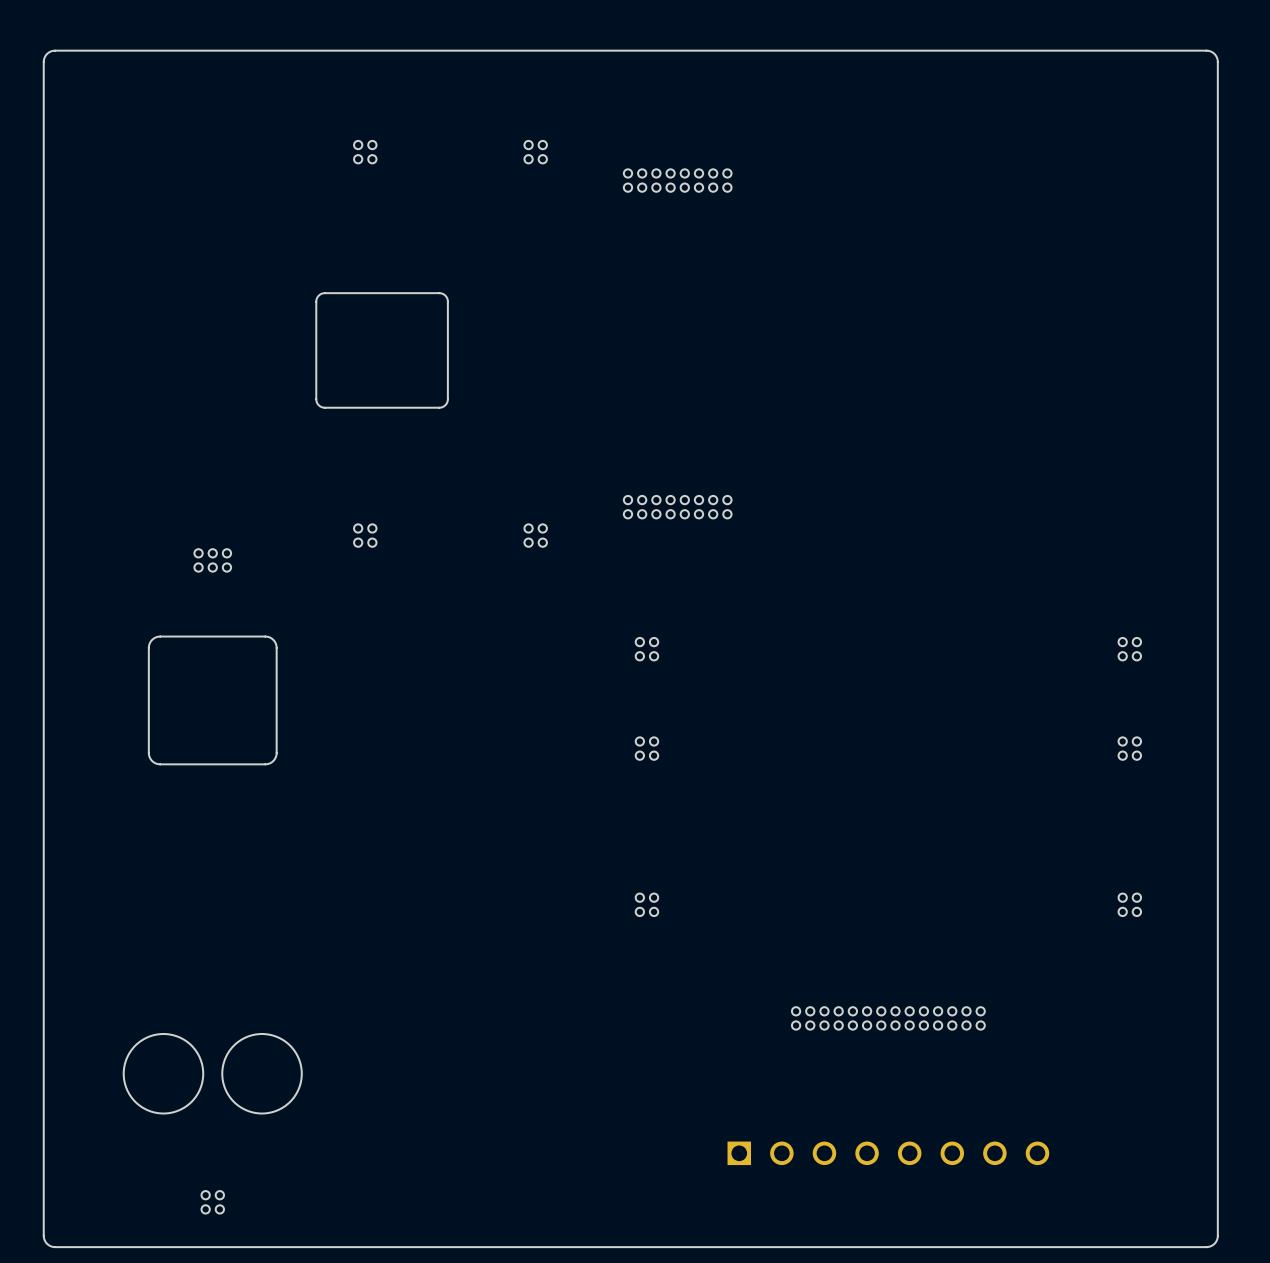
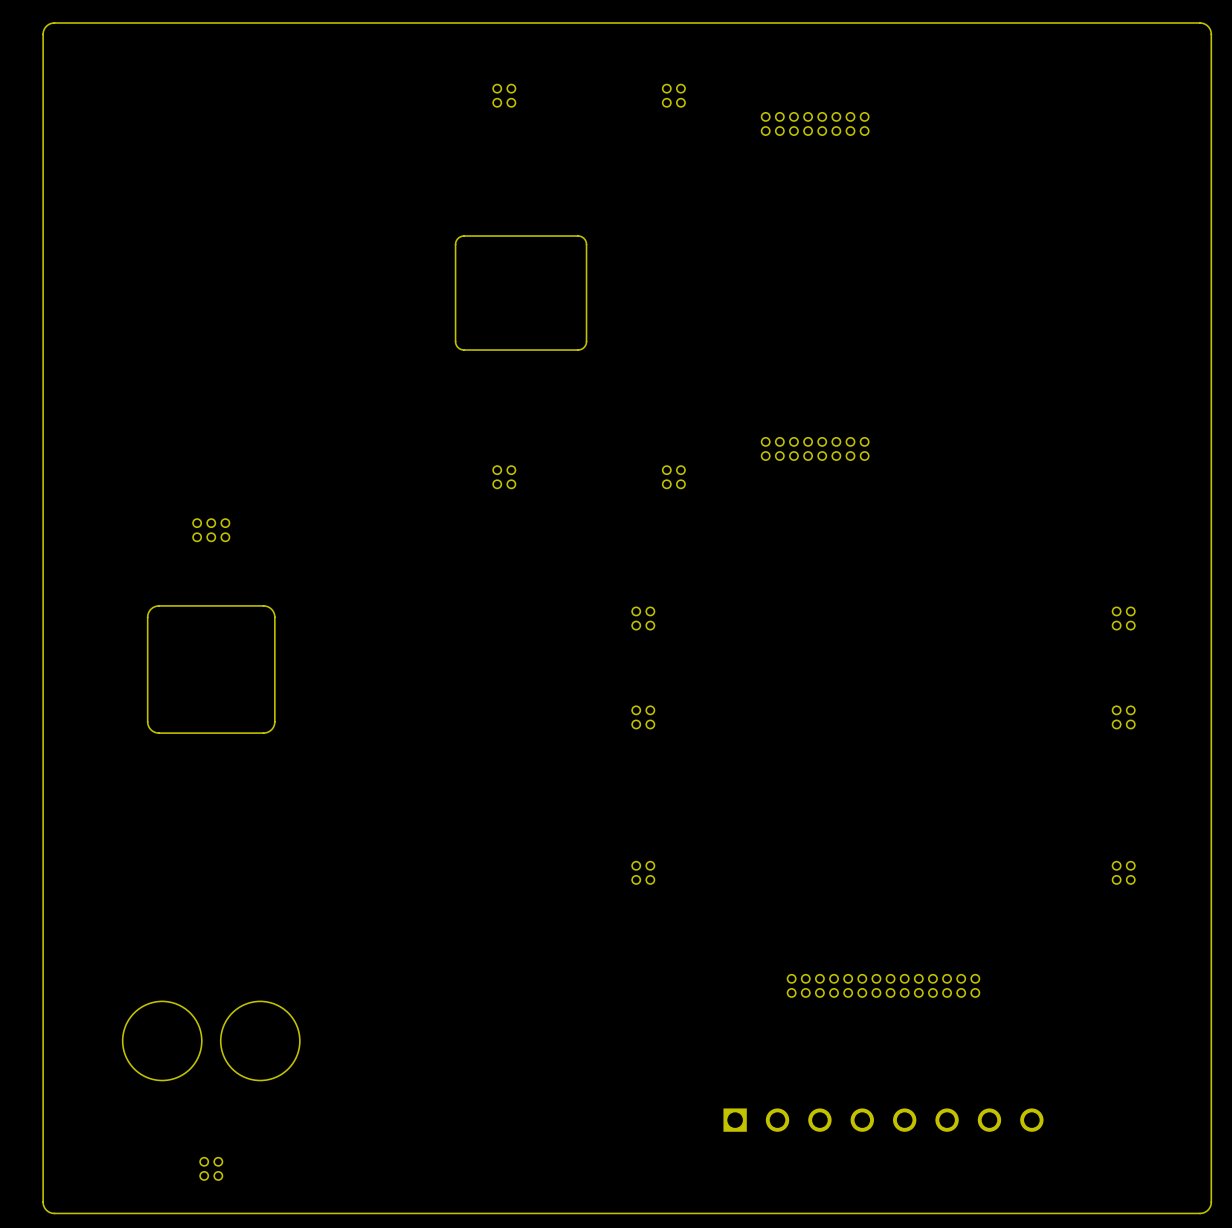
part: none -> (673, 95)
part: (365, 152) -> none
part position: (535, 152) -> (504, 95)
part position: (677, 180) -> (815, 123)
drawing position: (382, 350) -> (521, 293)
part: none -> (815, 448)
part footprint: [623, 495, 732, 519] -> [662, 466, 686, 489]
part: (365, 535) -> none
part position: (535, 535) -> (504, 477)

